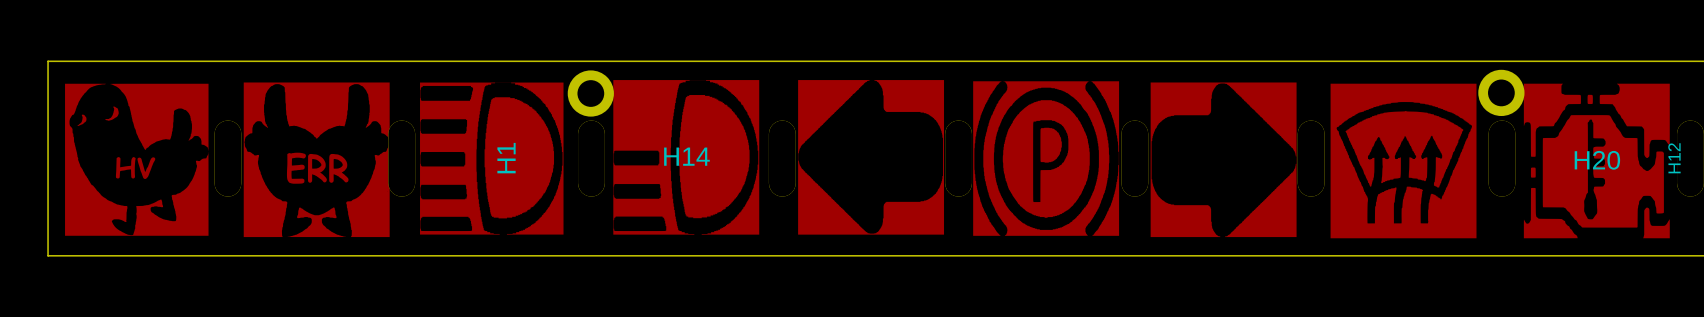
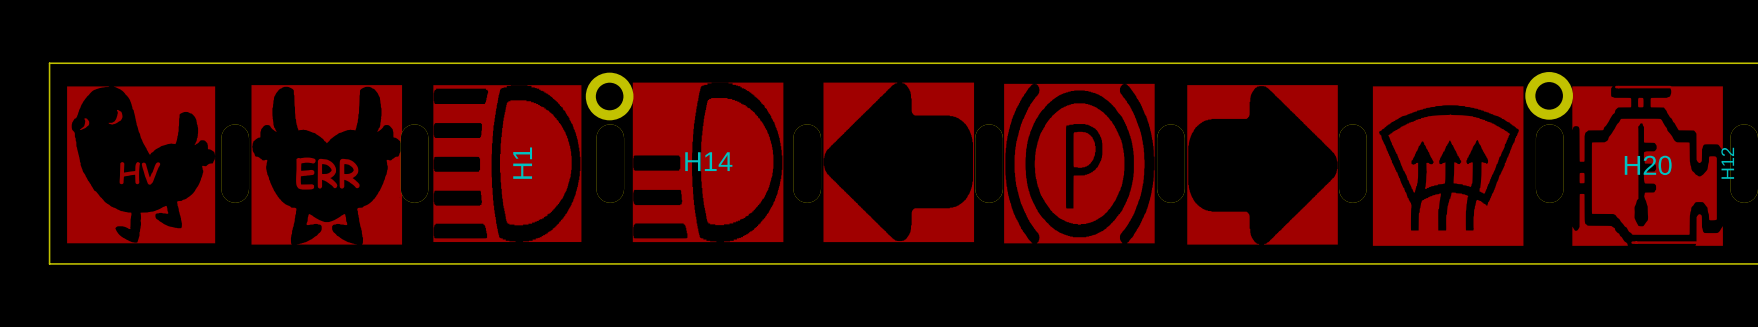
track: none -> (1616, 87) (1670, 87)
track: none -> (1632, 242) (1696, 242)

